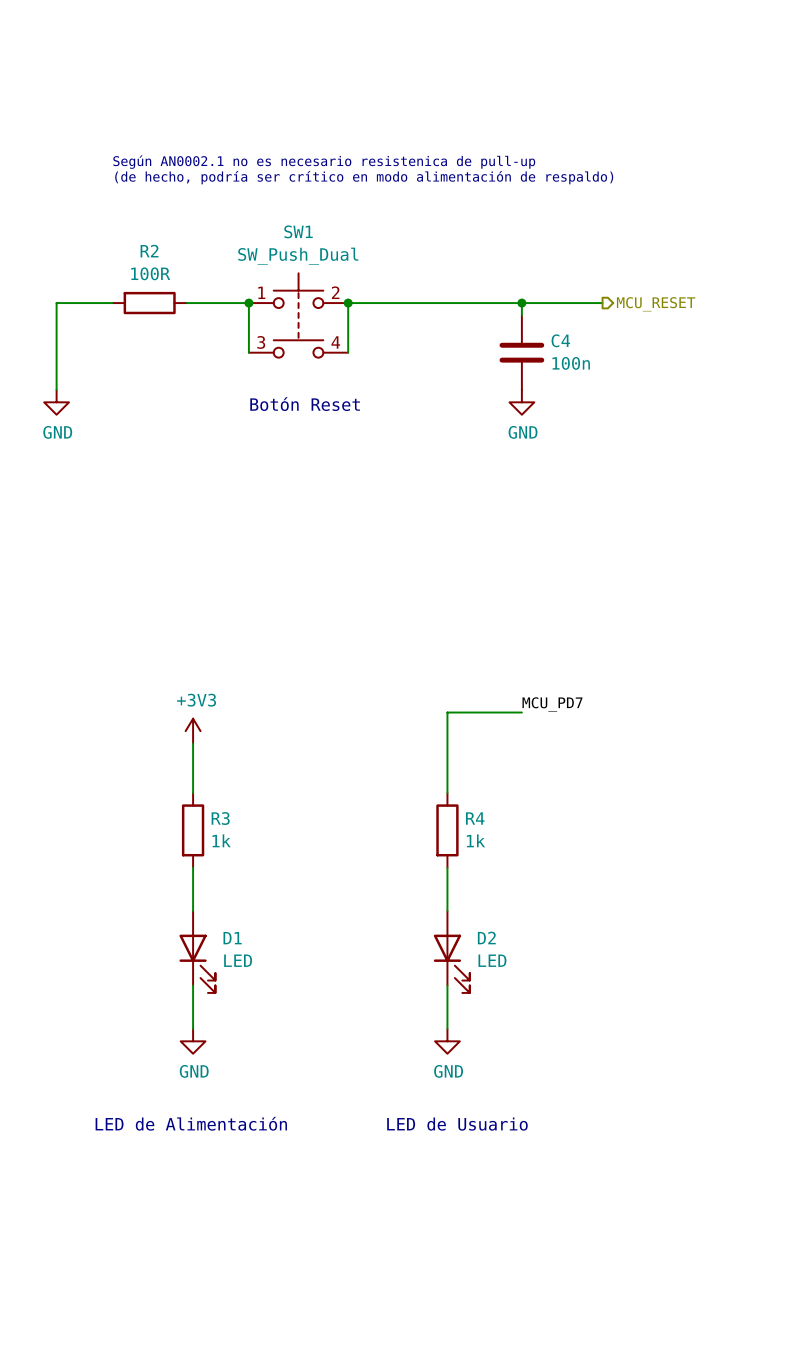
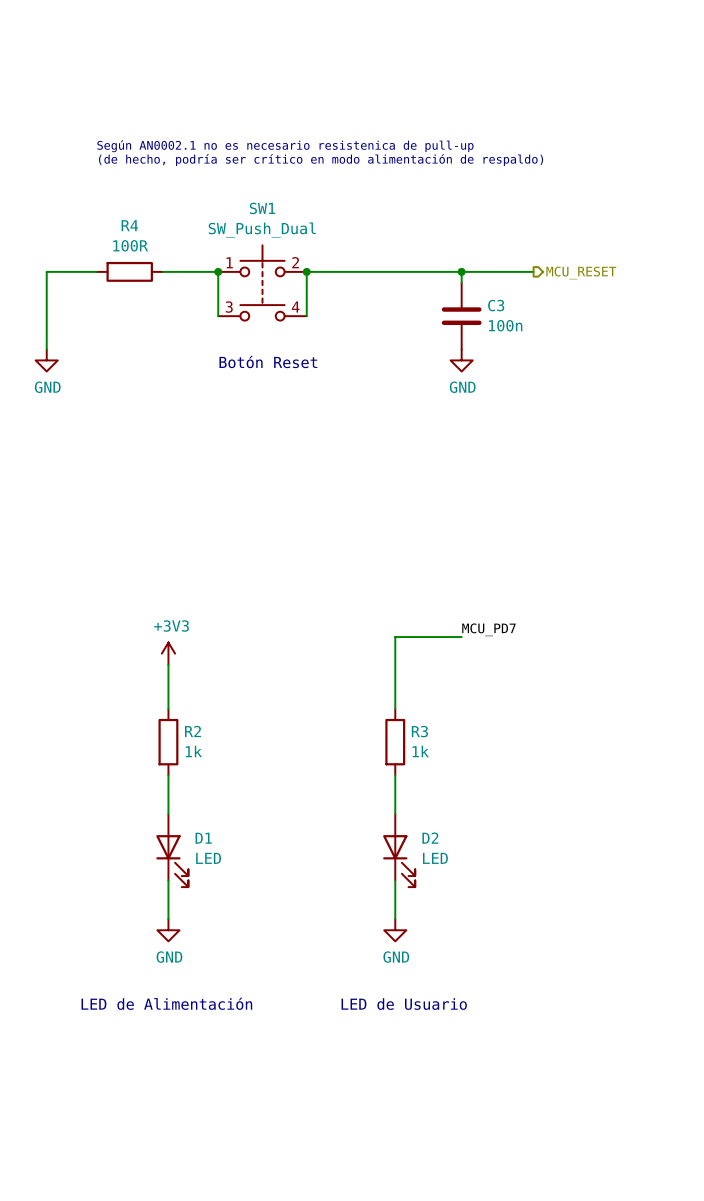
R2 name: R2 (149, 251) -> R4 (129, 225)
C4 name: C4 (560, 340) -> C3 (496, 305)
R3 name: R3 (220, 818) -> R2 (192, 731)
R4 name: R4 (475, 818) -> R3 (419, 731)

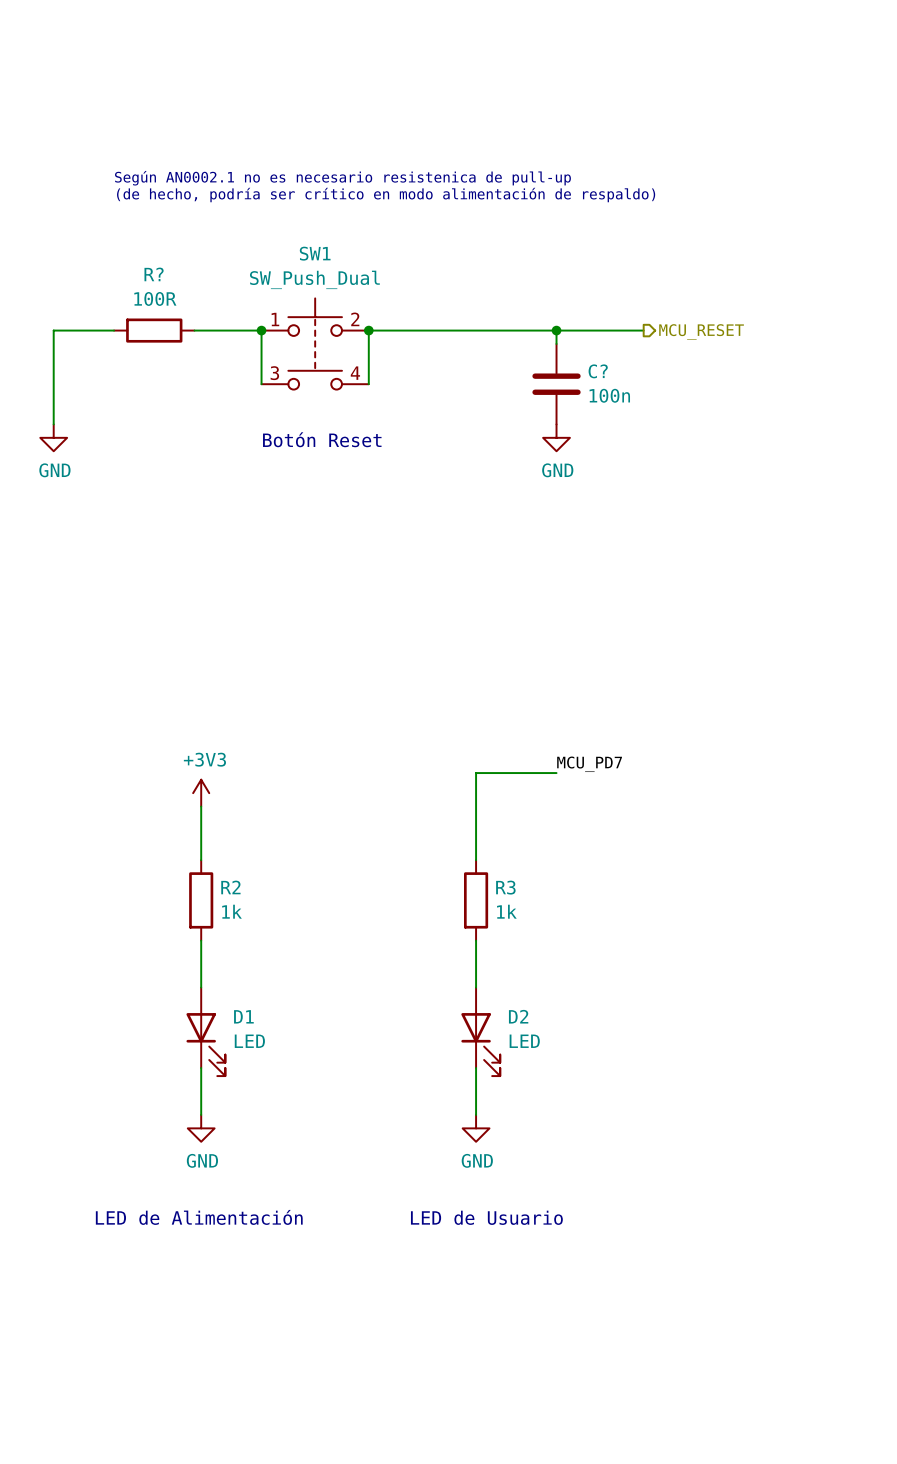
R4 name: R4 (129, 225) -> R? (154, 274)
C3 name: C3 (496, 305) -> C? (598, 371)

